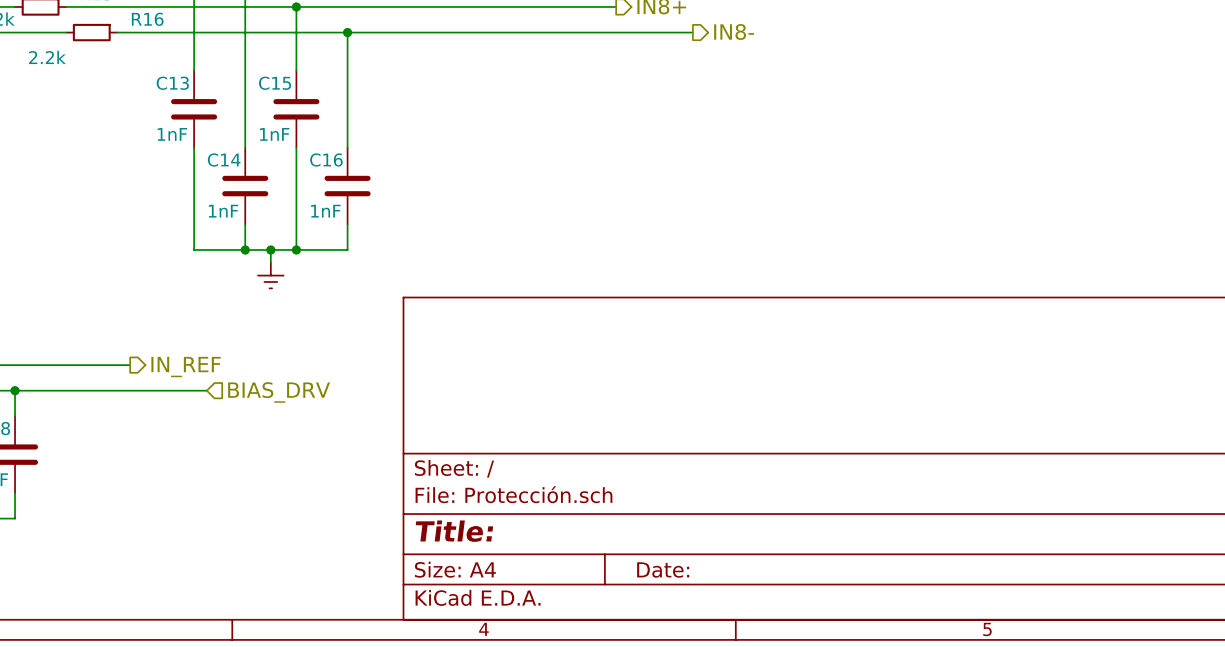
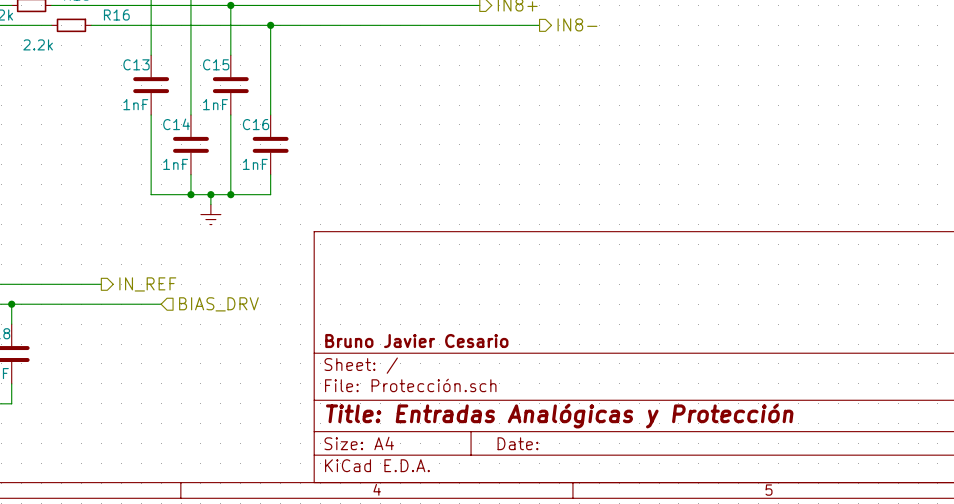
title block: none -> Bruno Javier Cesario (416, 341)
title block: Title: (454, 531) -> Title: Entradas Analógicas y Protección (559, 416)

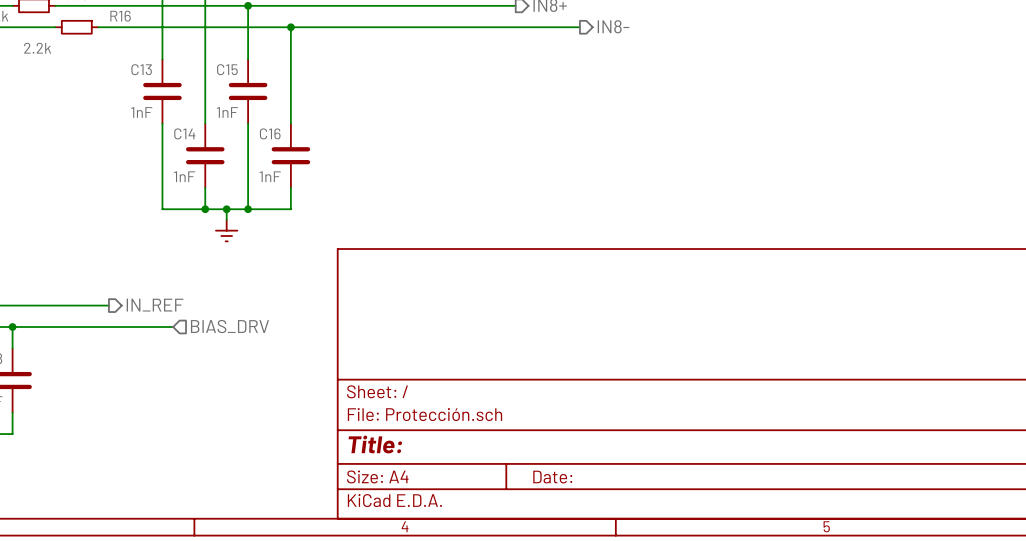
title block: Bruno Javier Cesario (416, 341) -> none
title block: Title: Entradas Analógicas y Protección (559, 416) -> Title: (375, 444)

